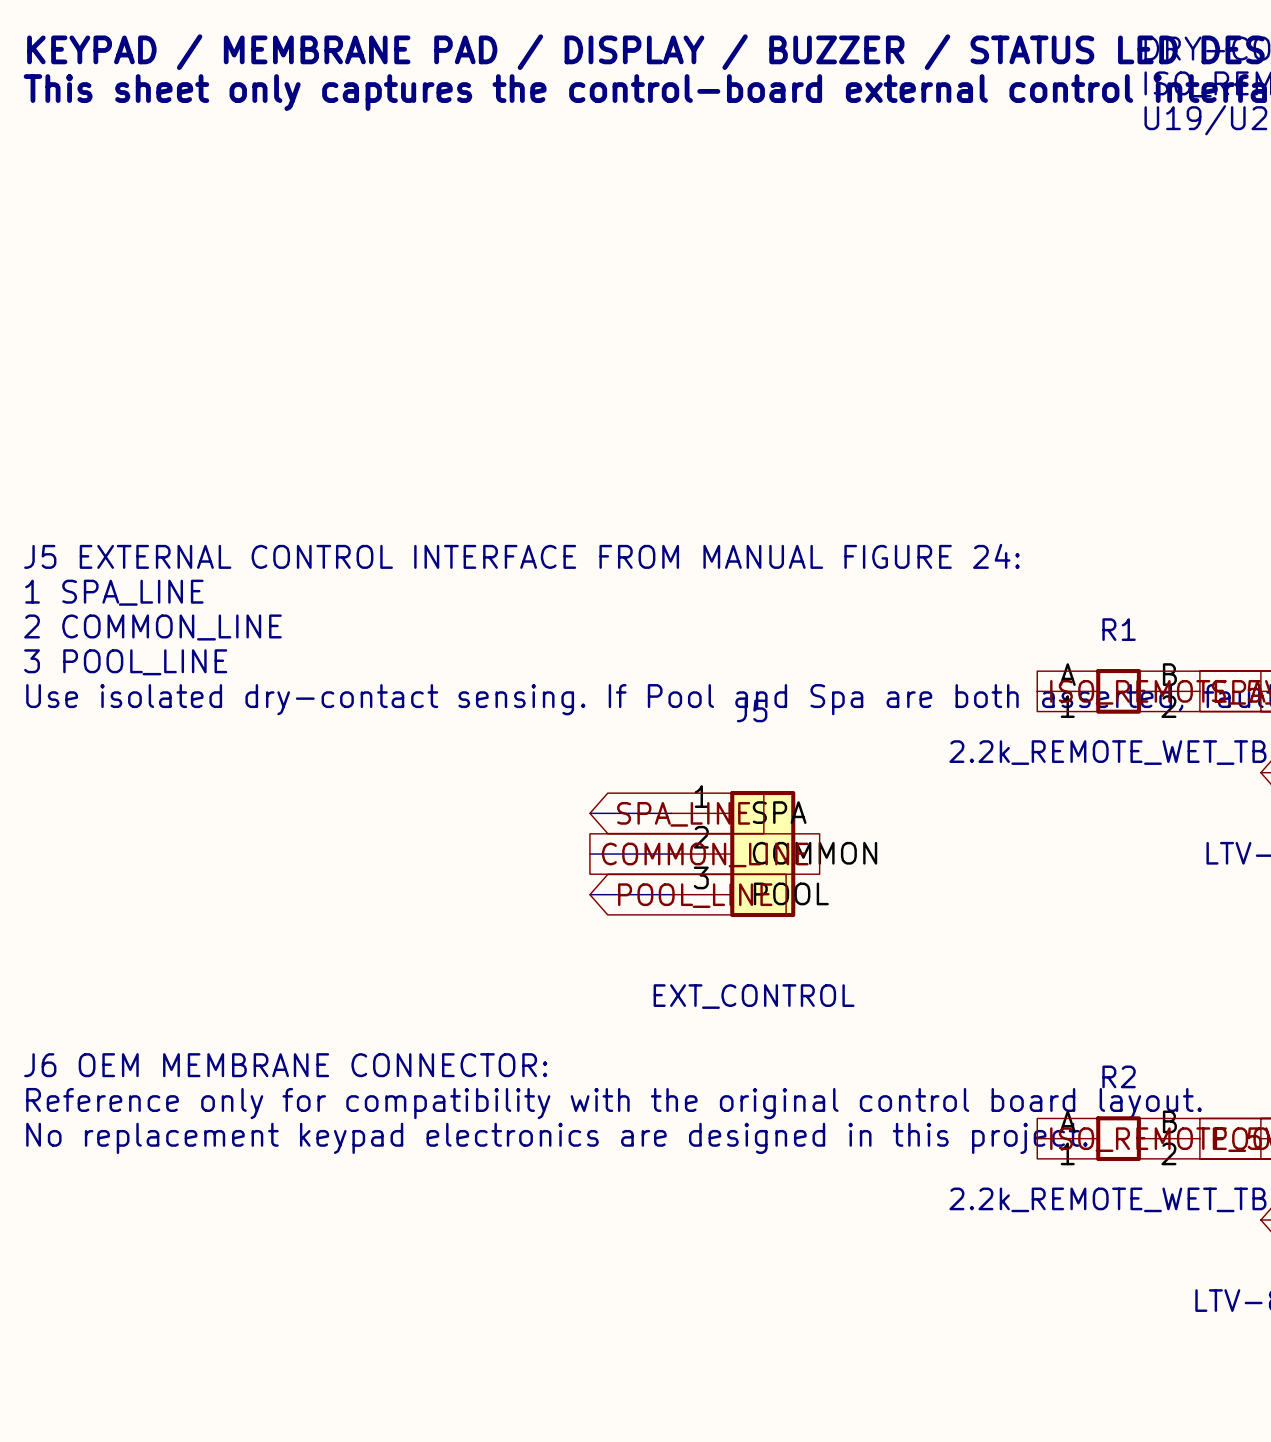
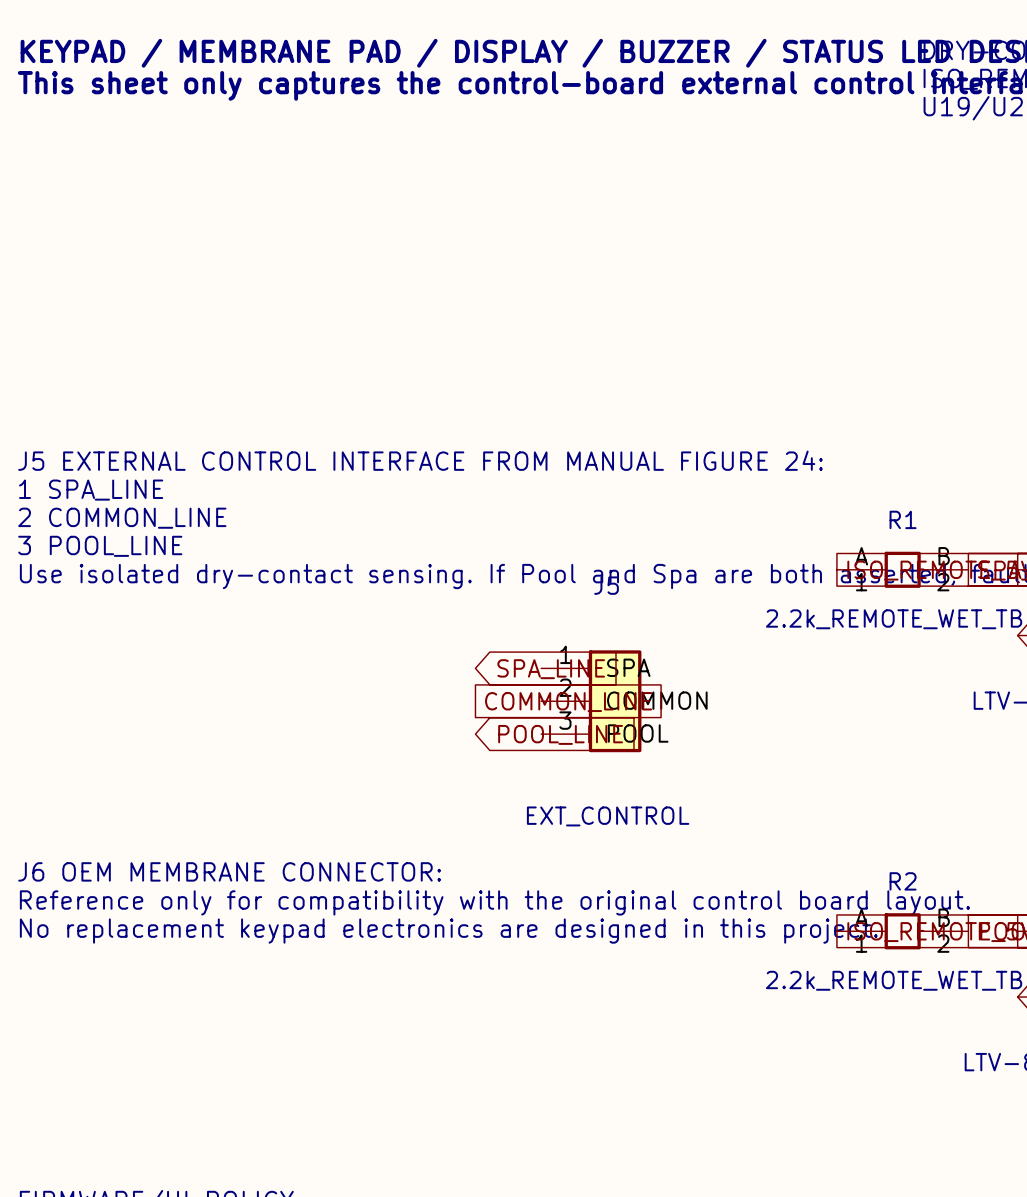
wire: (589, 813) (671, 813) -> none
wire: (589, 854) (671, 854) -> none
wire: (589, 894) (671, 894) -> none

